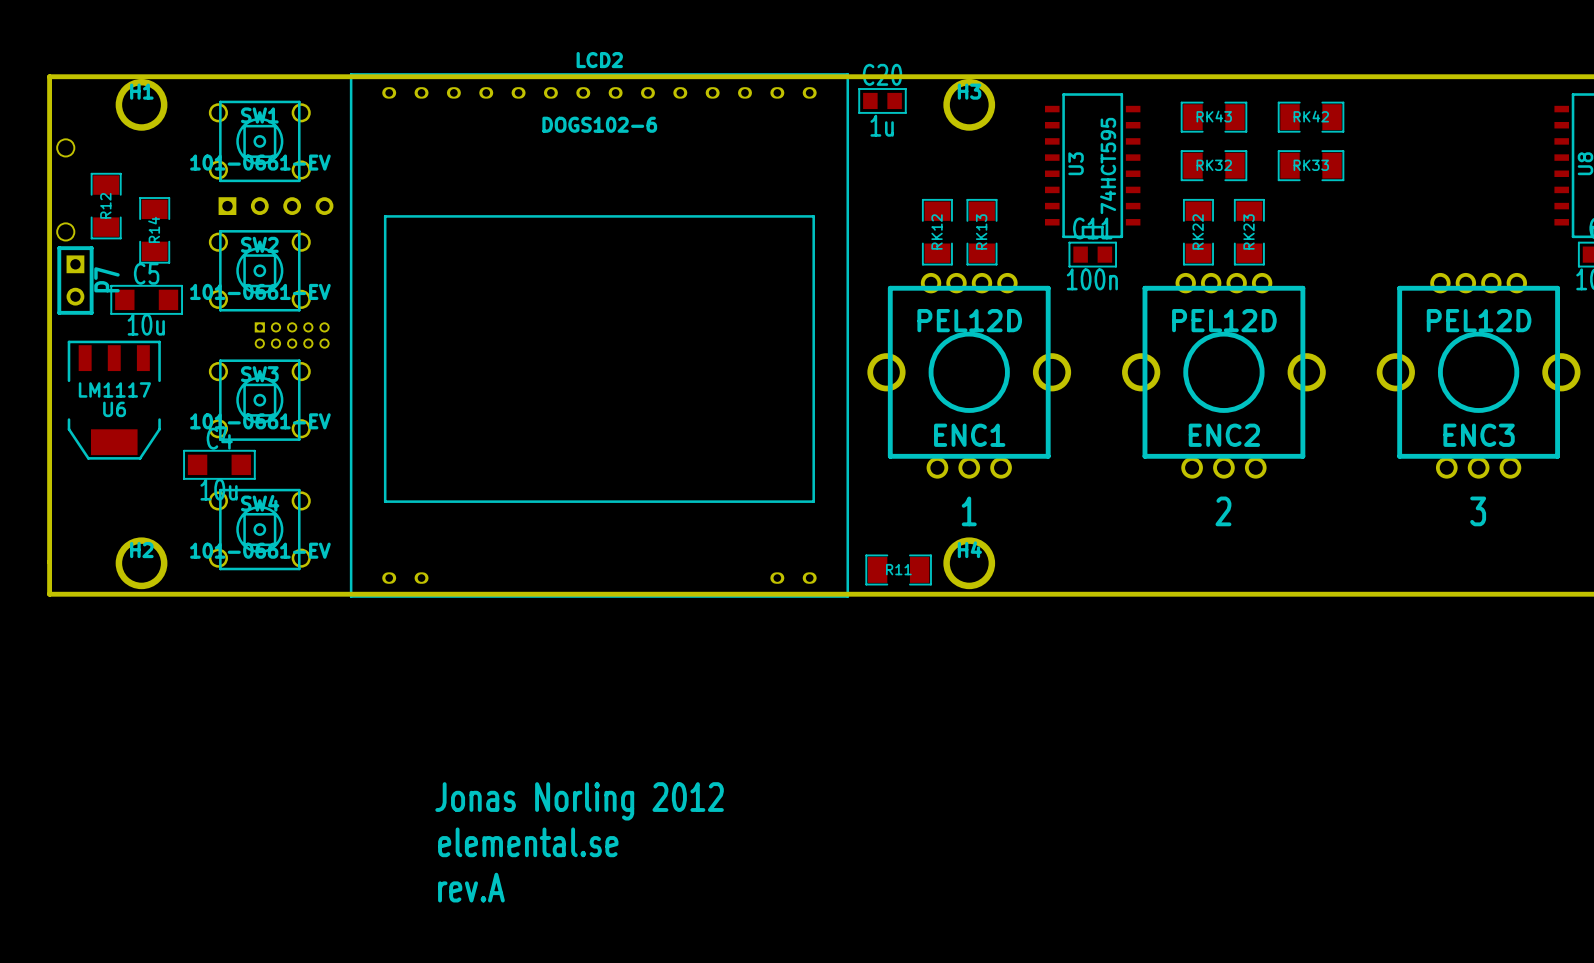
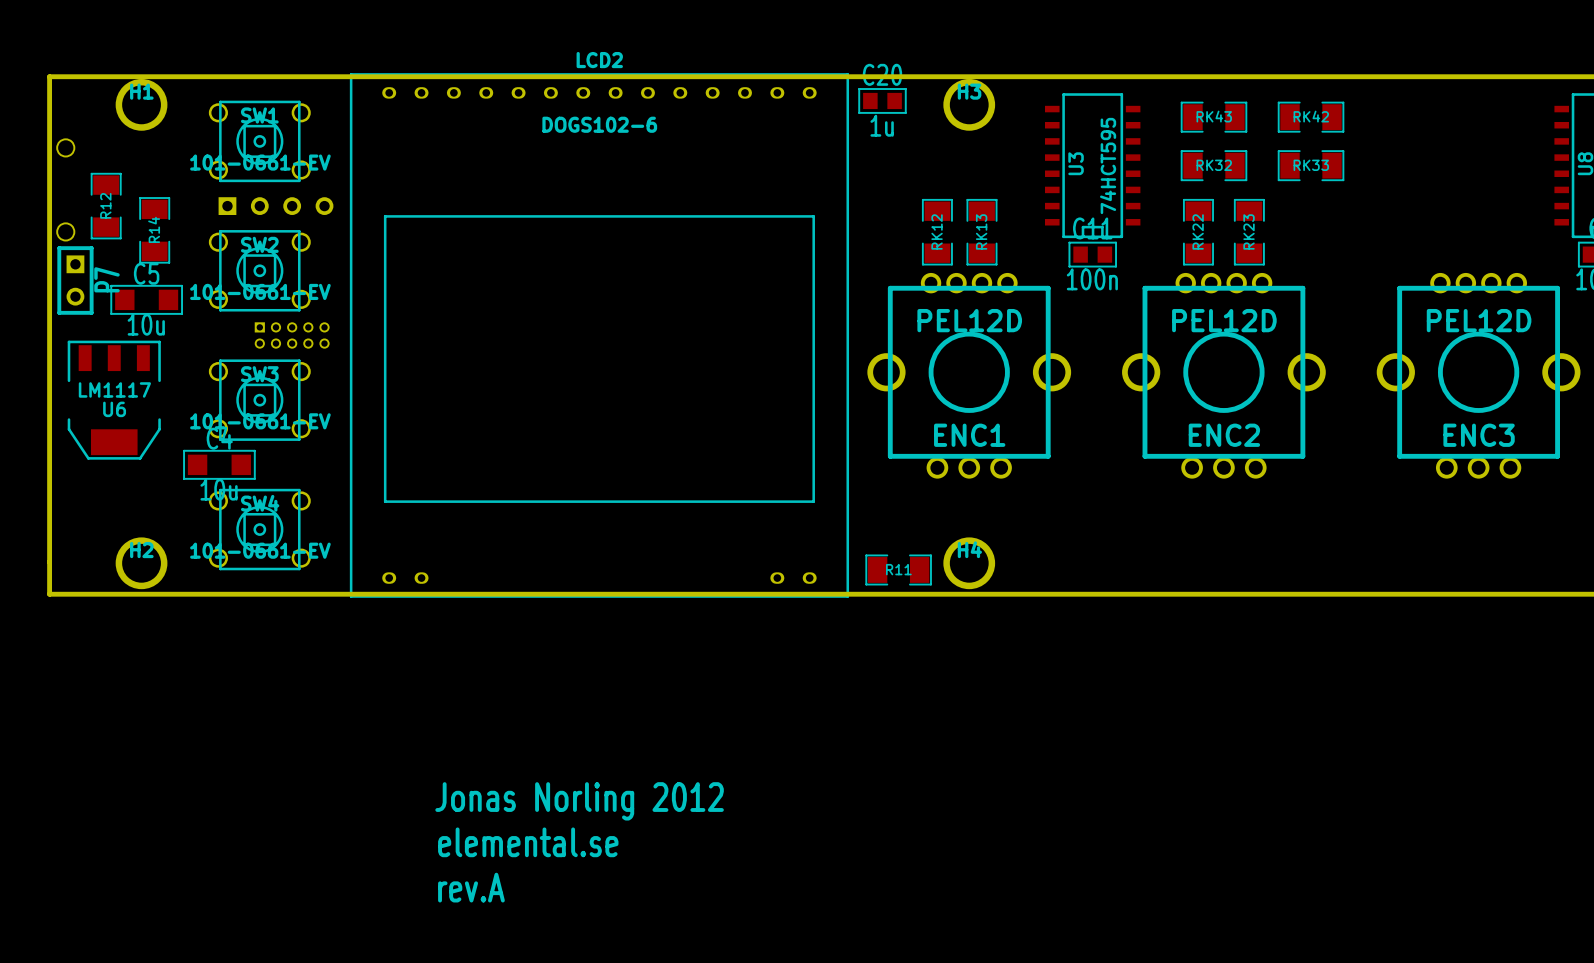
text: 1 (969, 511) -> none
text: 2 (1223, 511) -> none
text: 3 (1478, 511) -> none

